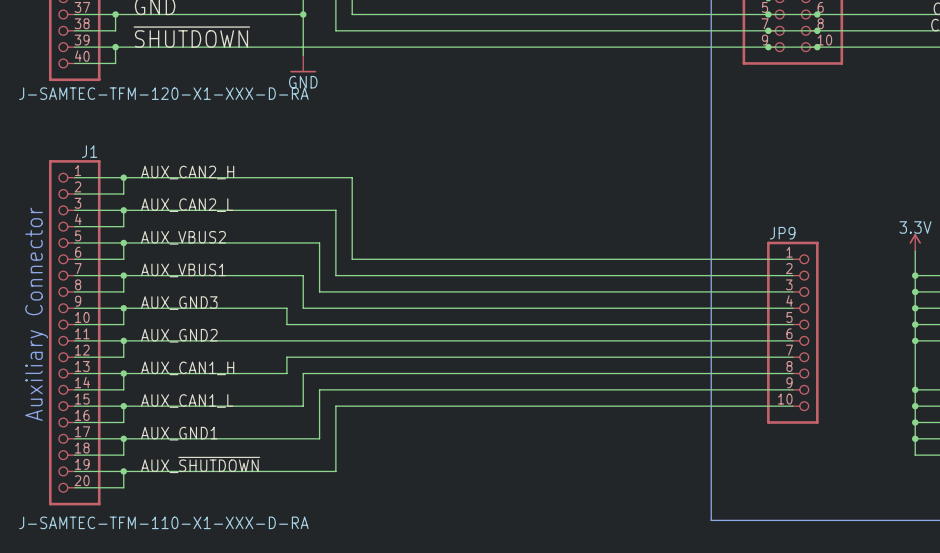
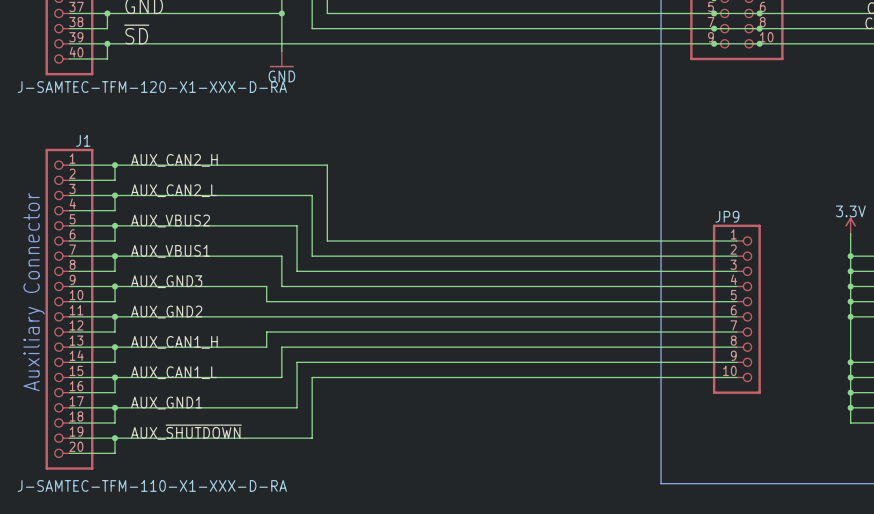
label: ~{SHUTDOWN} (191, 37) -> ~{SD} (136, 34)

